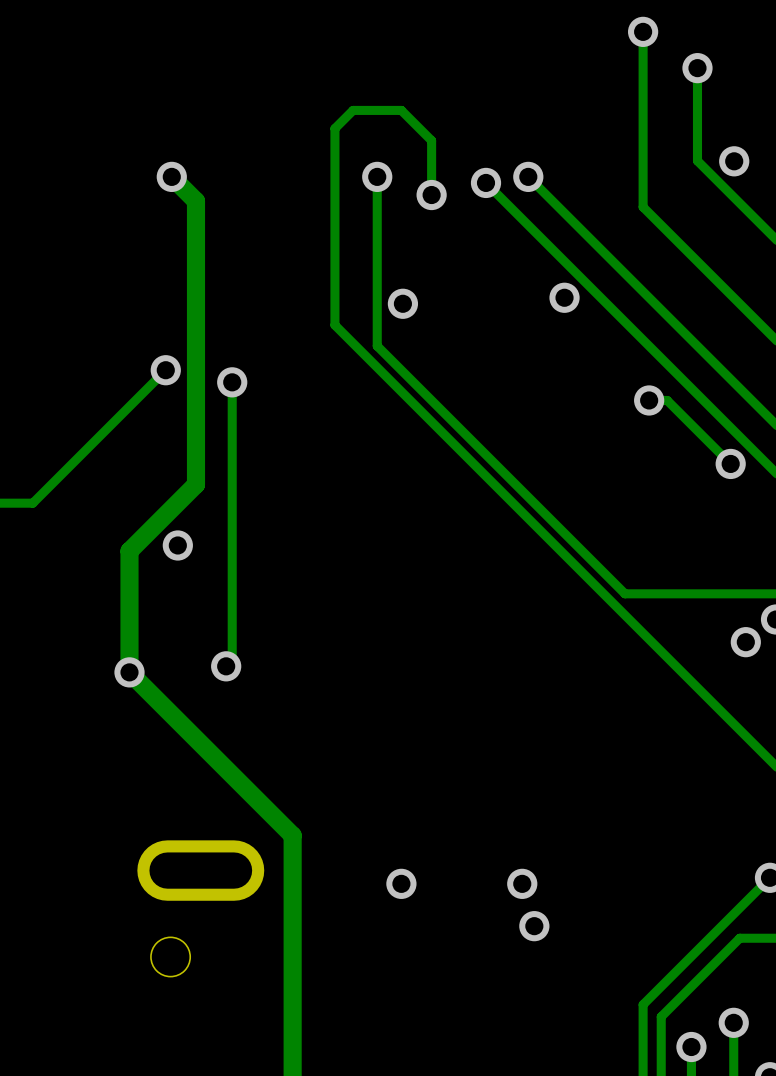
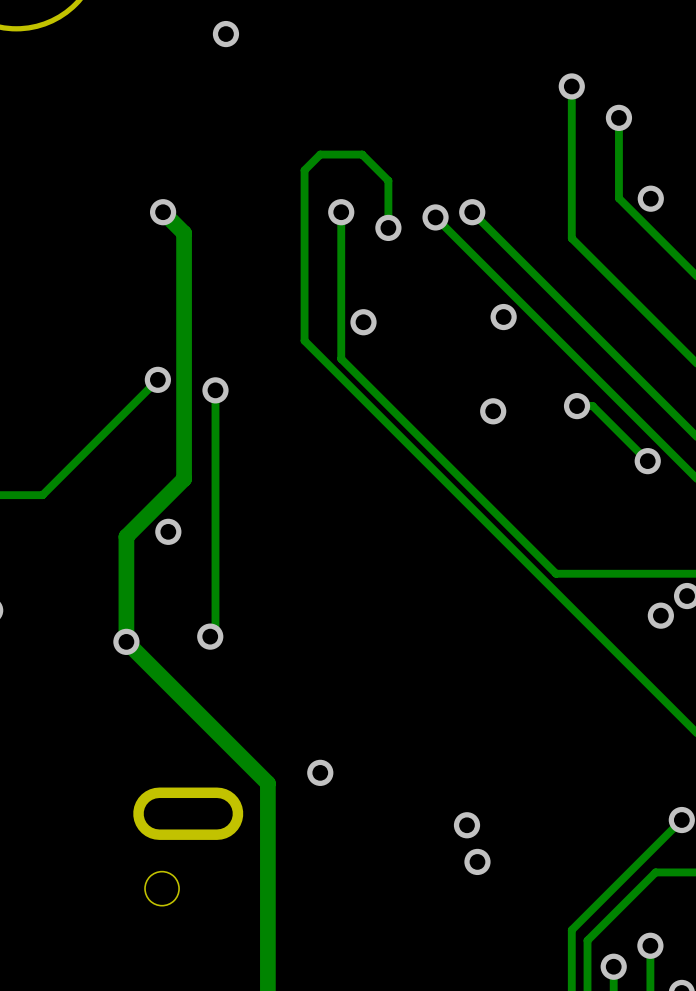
via: none -> (493, 411)
via position: (401, 883) -> (320, 772)

